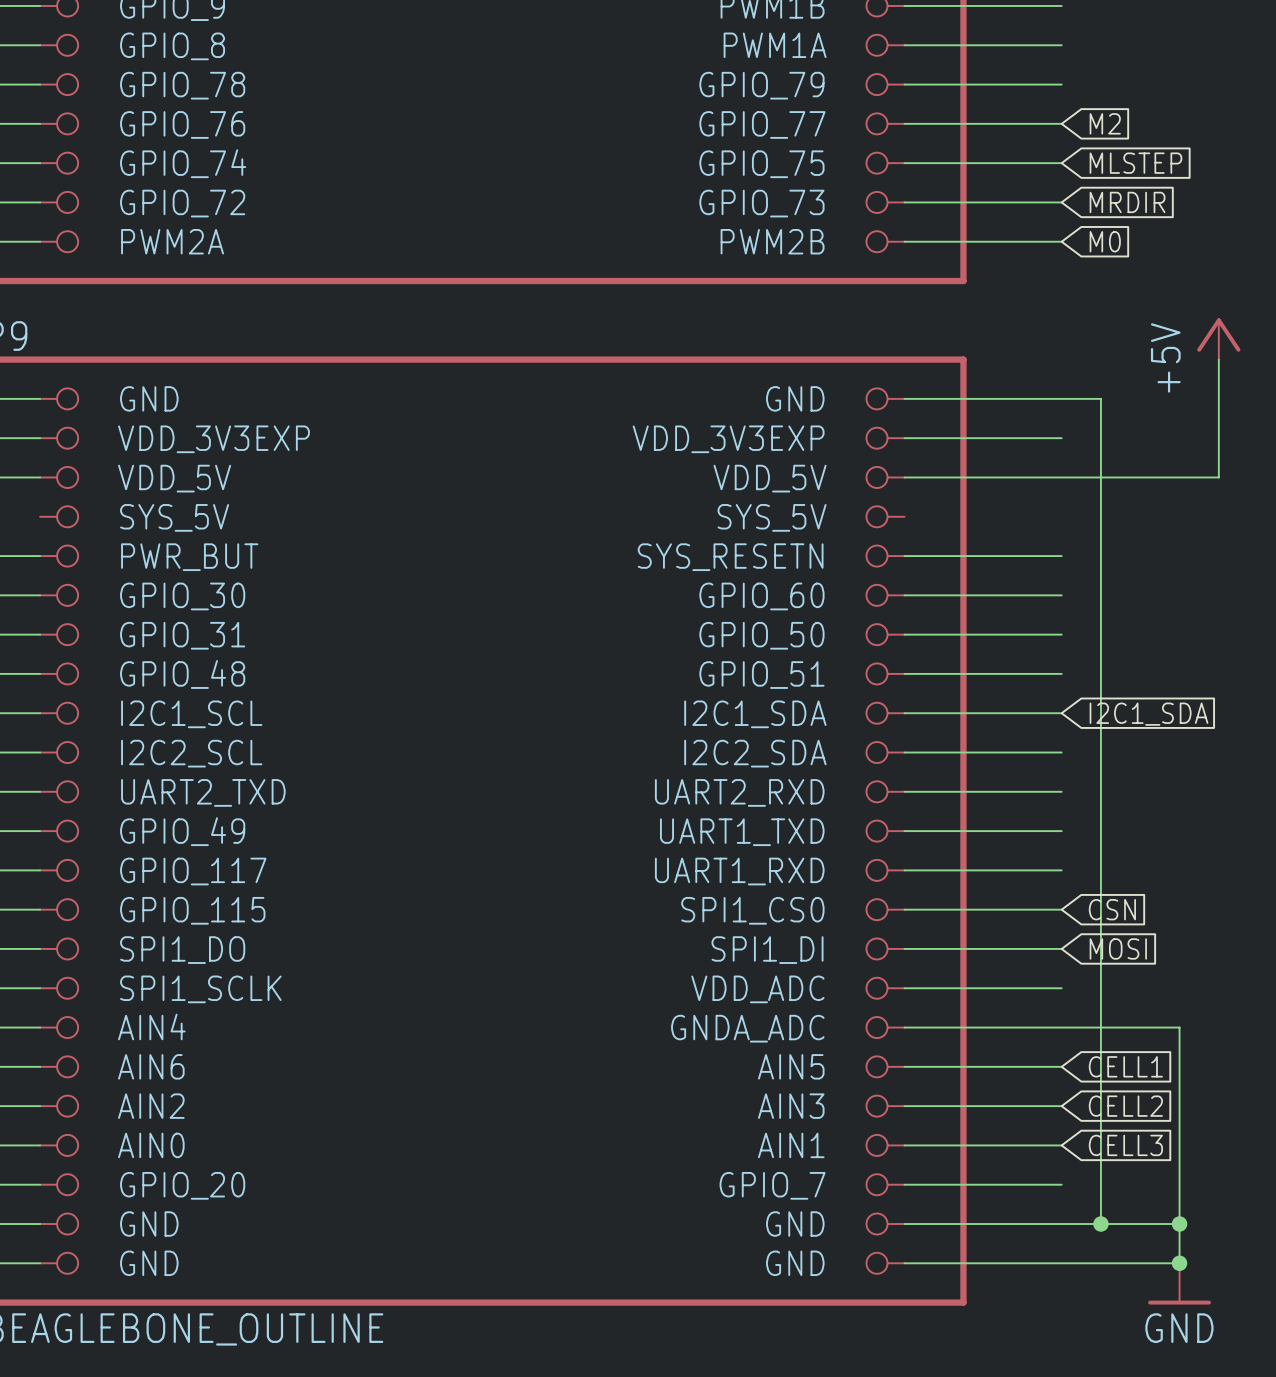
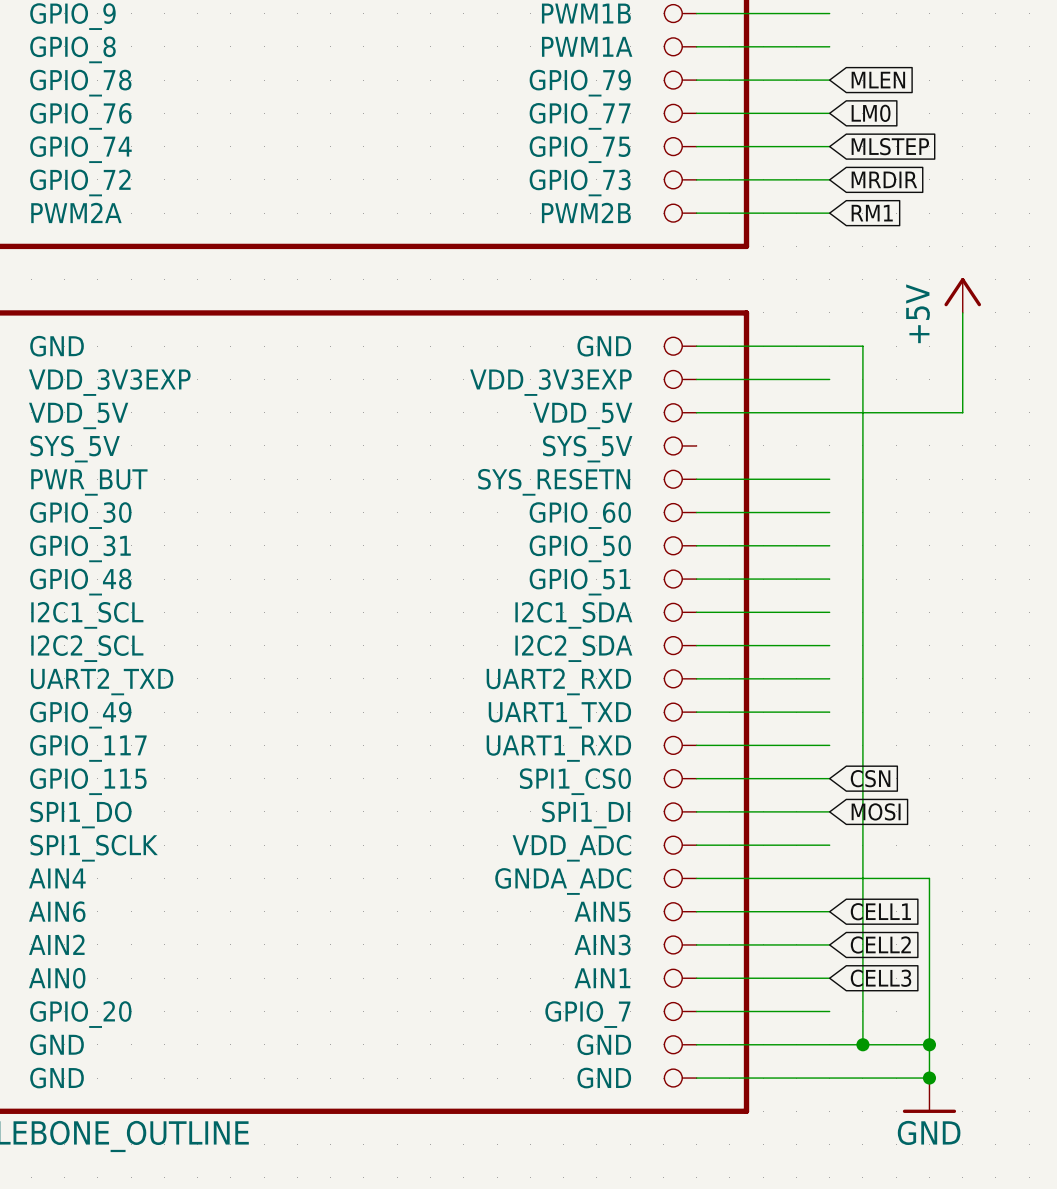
global label: none -> MLEN (878, 80)
global label: M2 (1105, 123) -> LM0 (871, 113)
global label: M0 (1105, 241) -> RM1 (872, 213)
global label: I2C1_SDA (1149, 714) -> none

